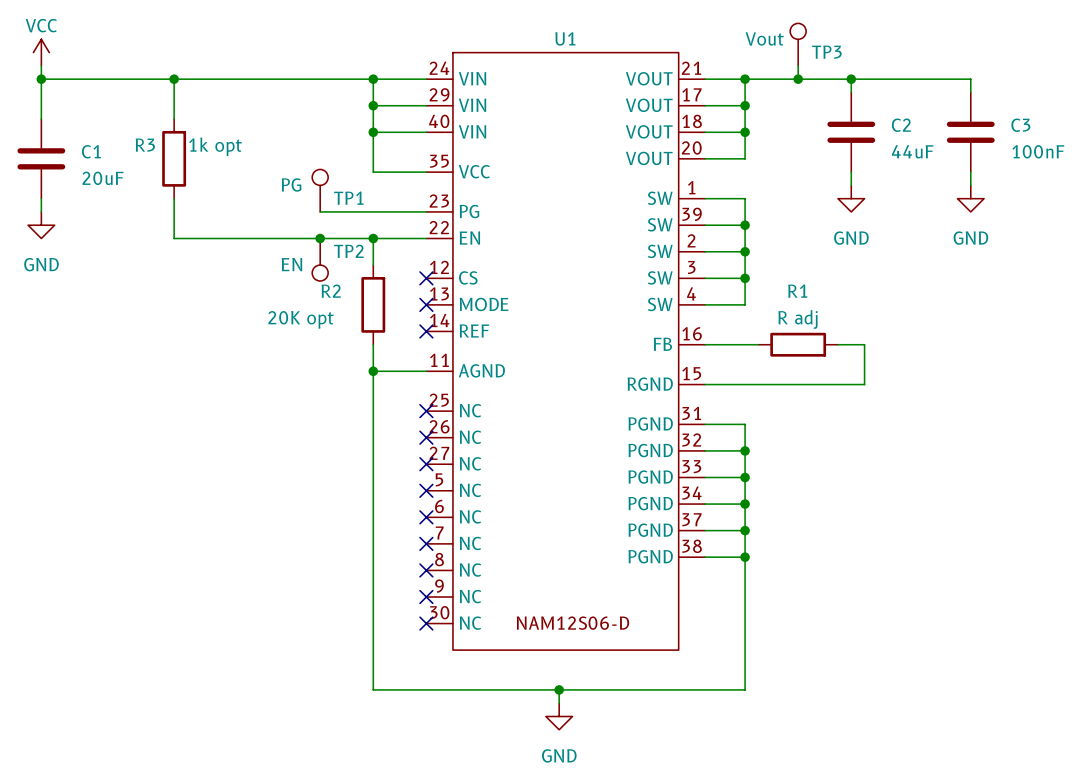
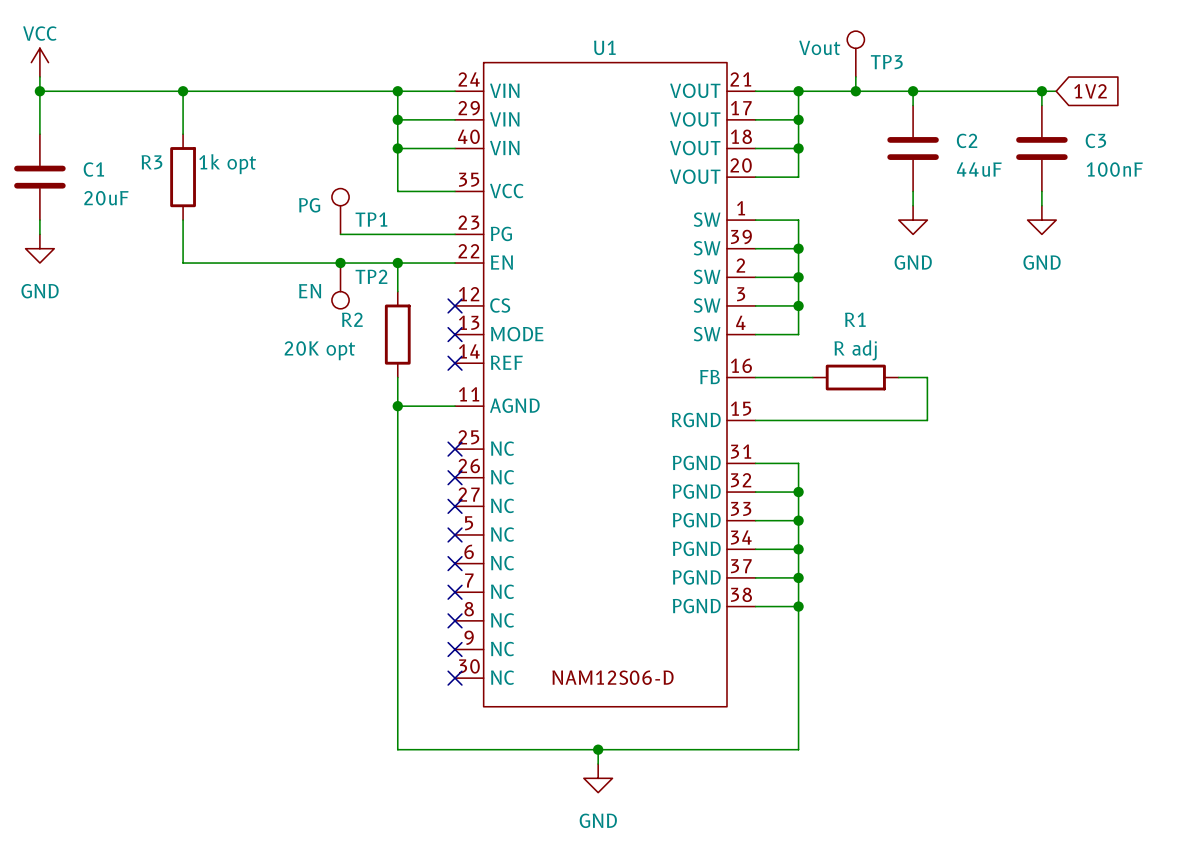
wire: none -> (1041, 91) (1056, 91)
junction: none -> (1041, 91)
global label: none -> 1V2 (1090, 91)

